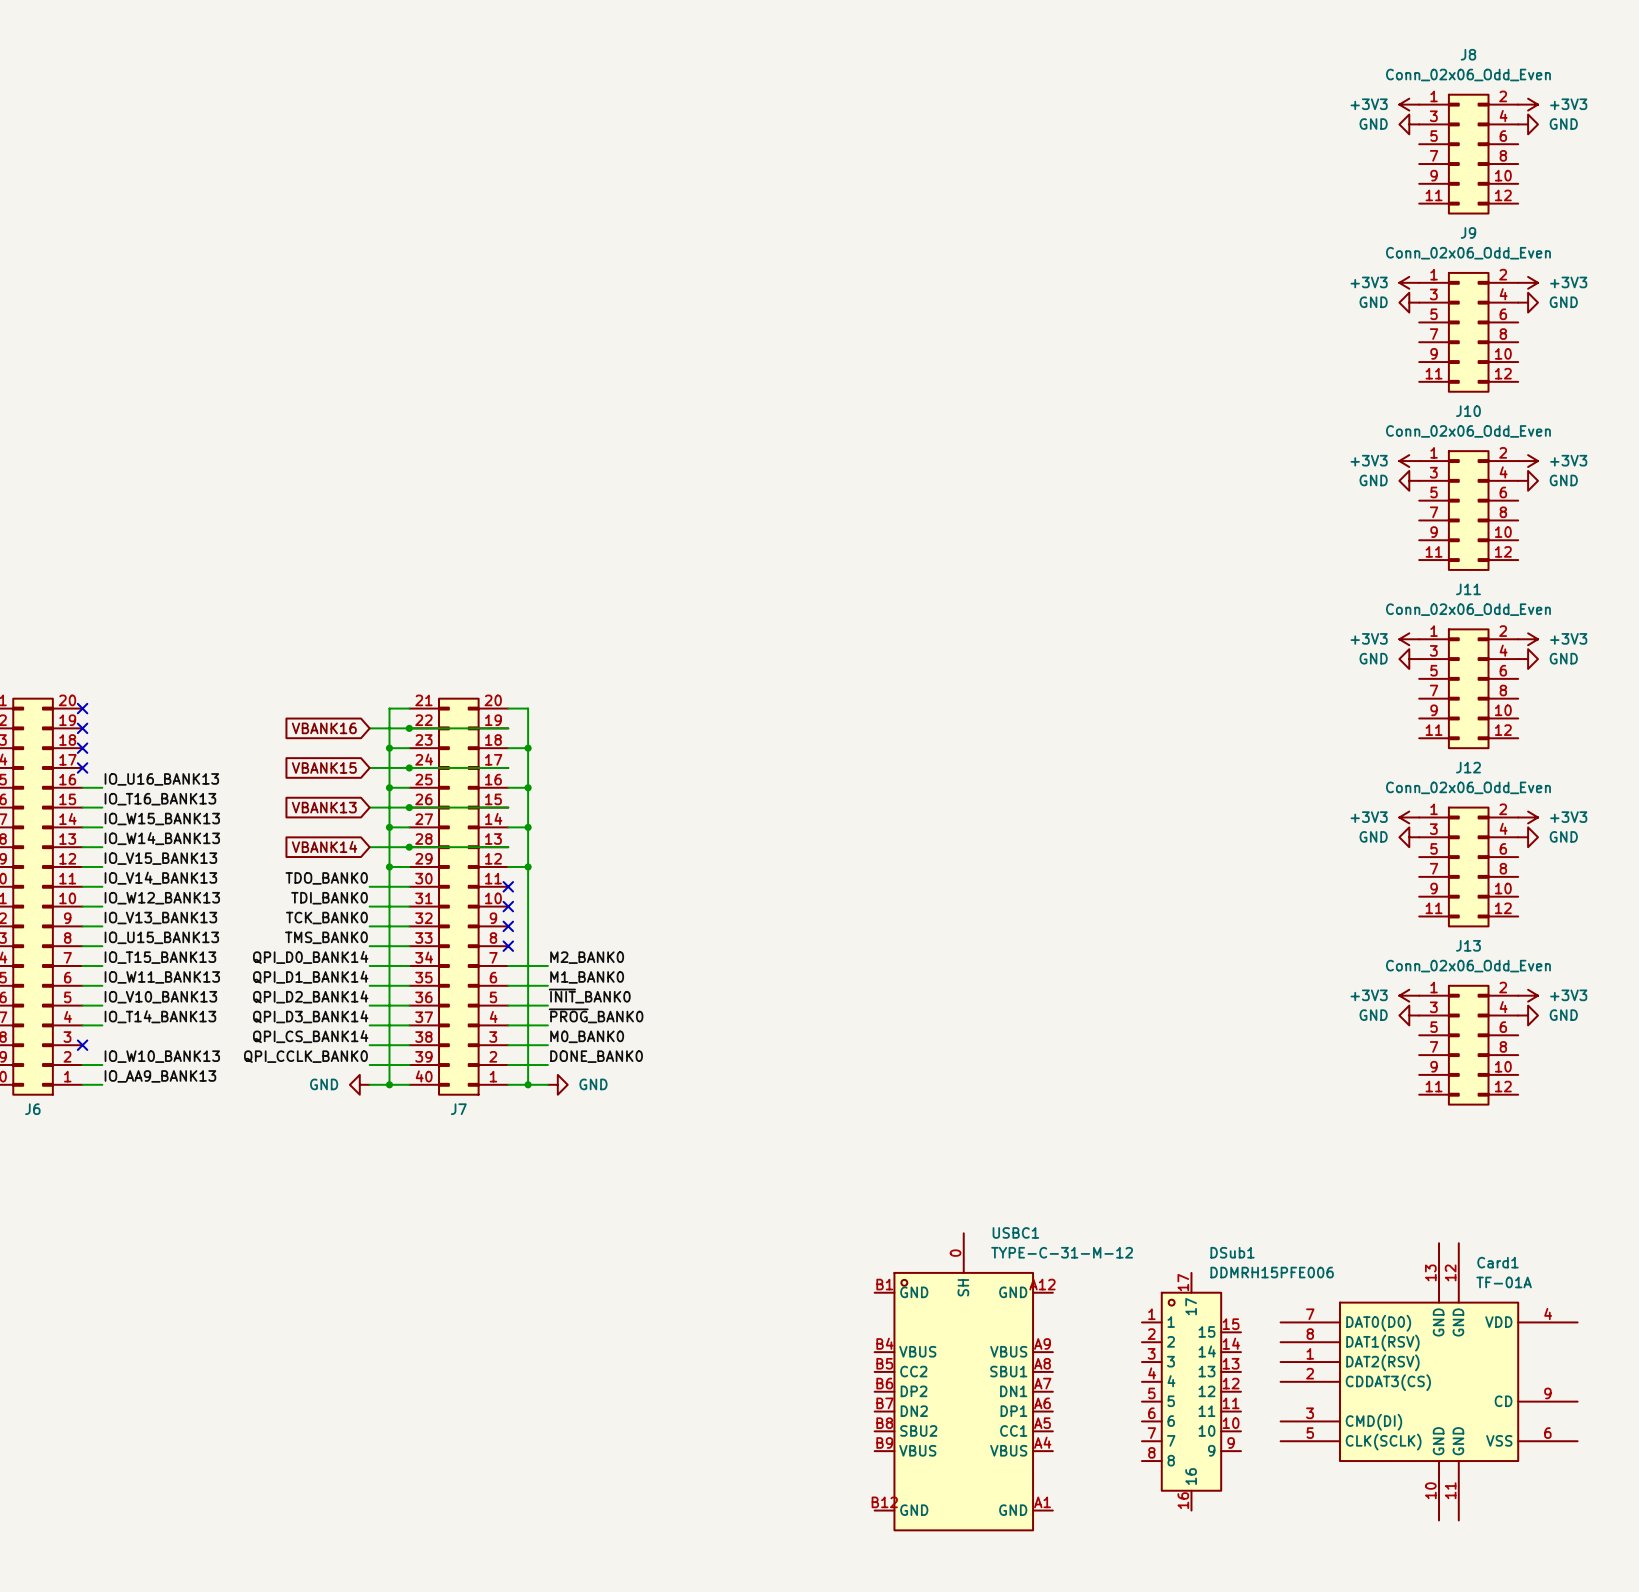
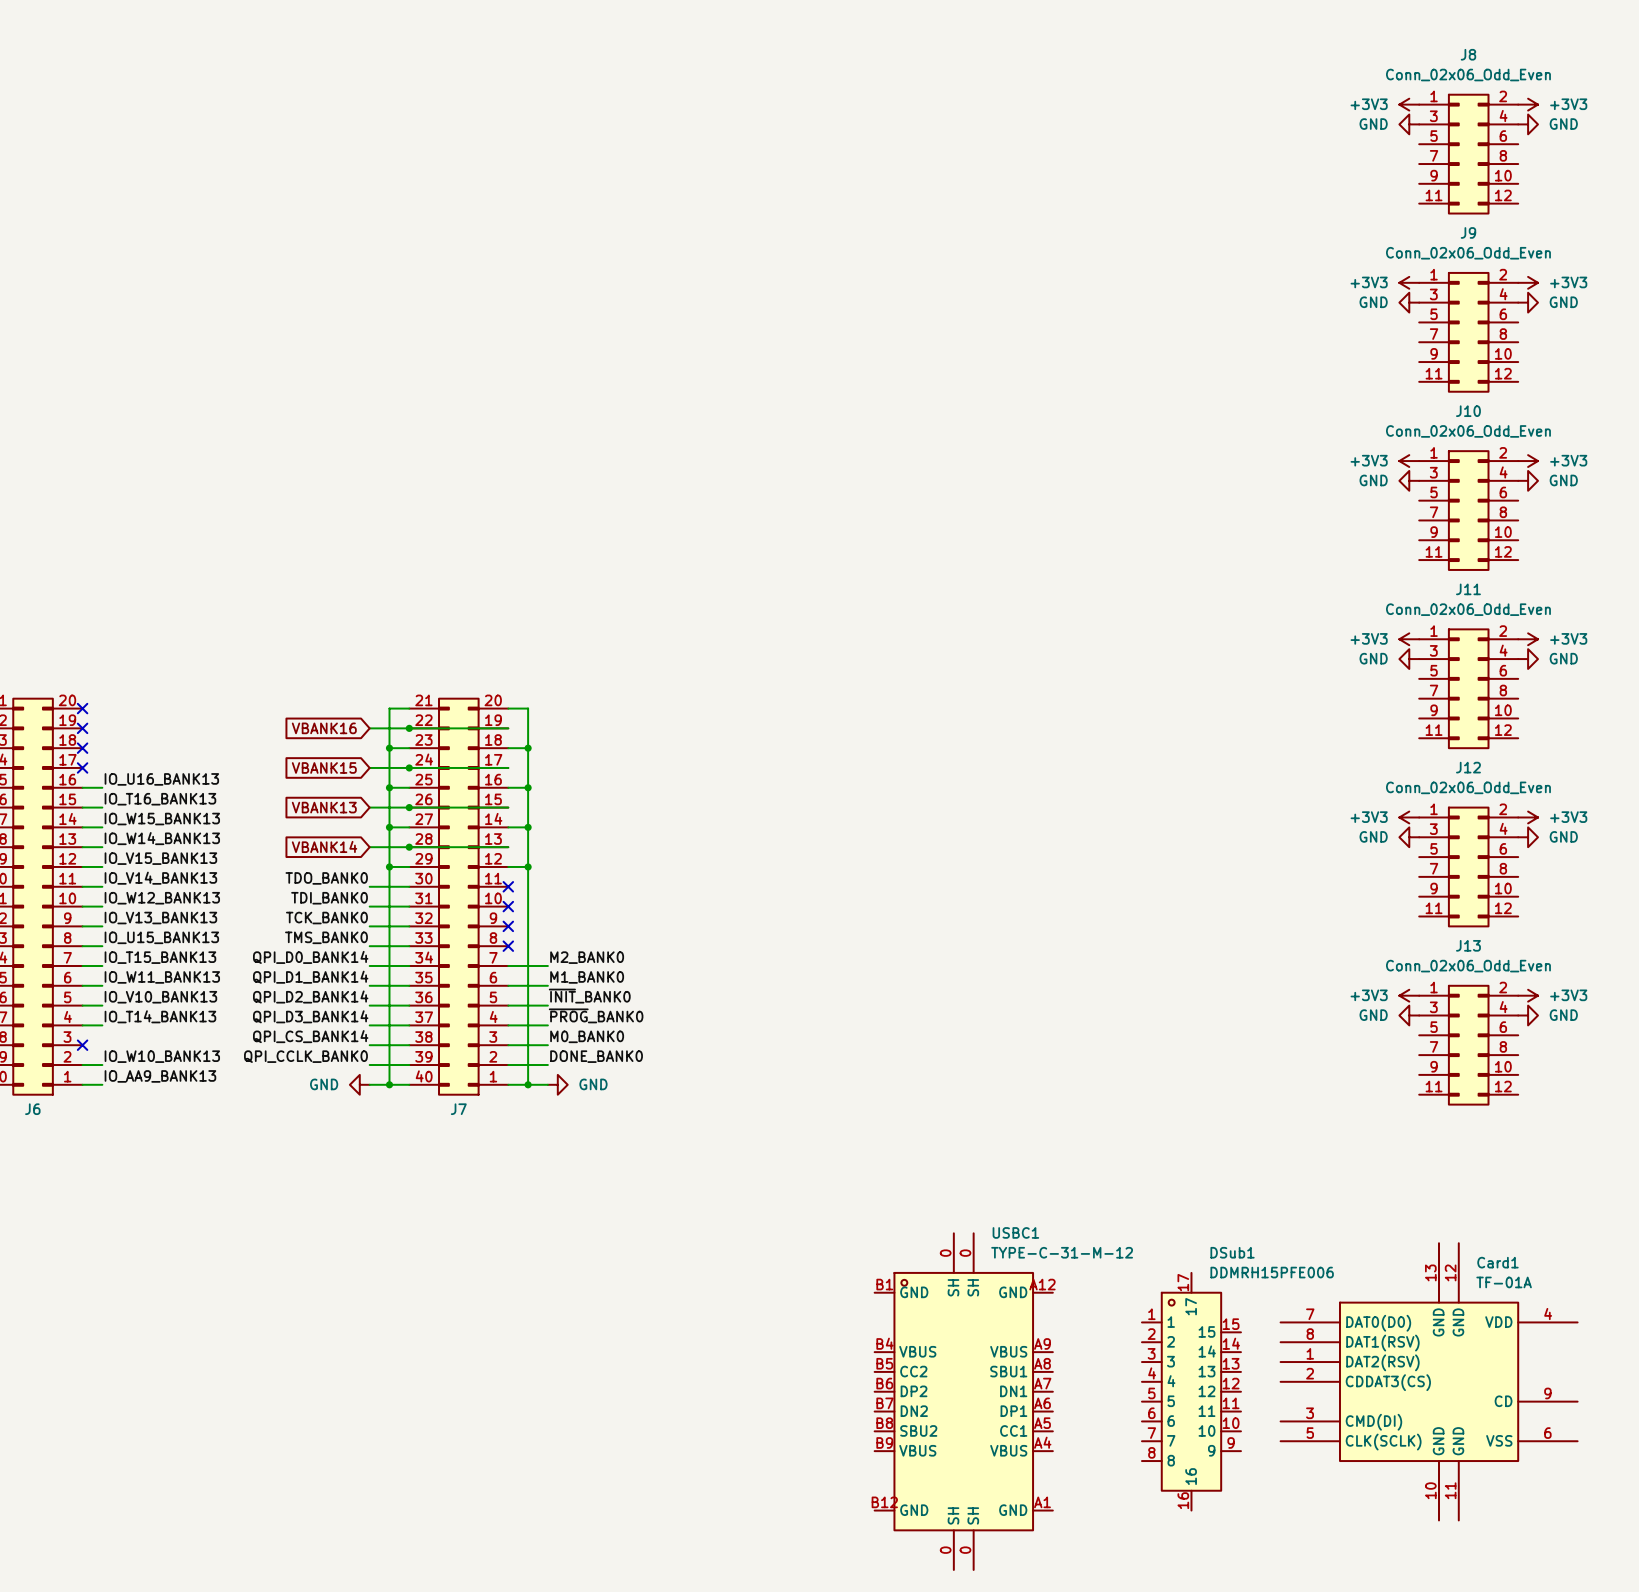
USBC1 symbol: [874, 1233, 1053, 1531] -> [874, 1233, 1053, 1570]

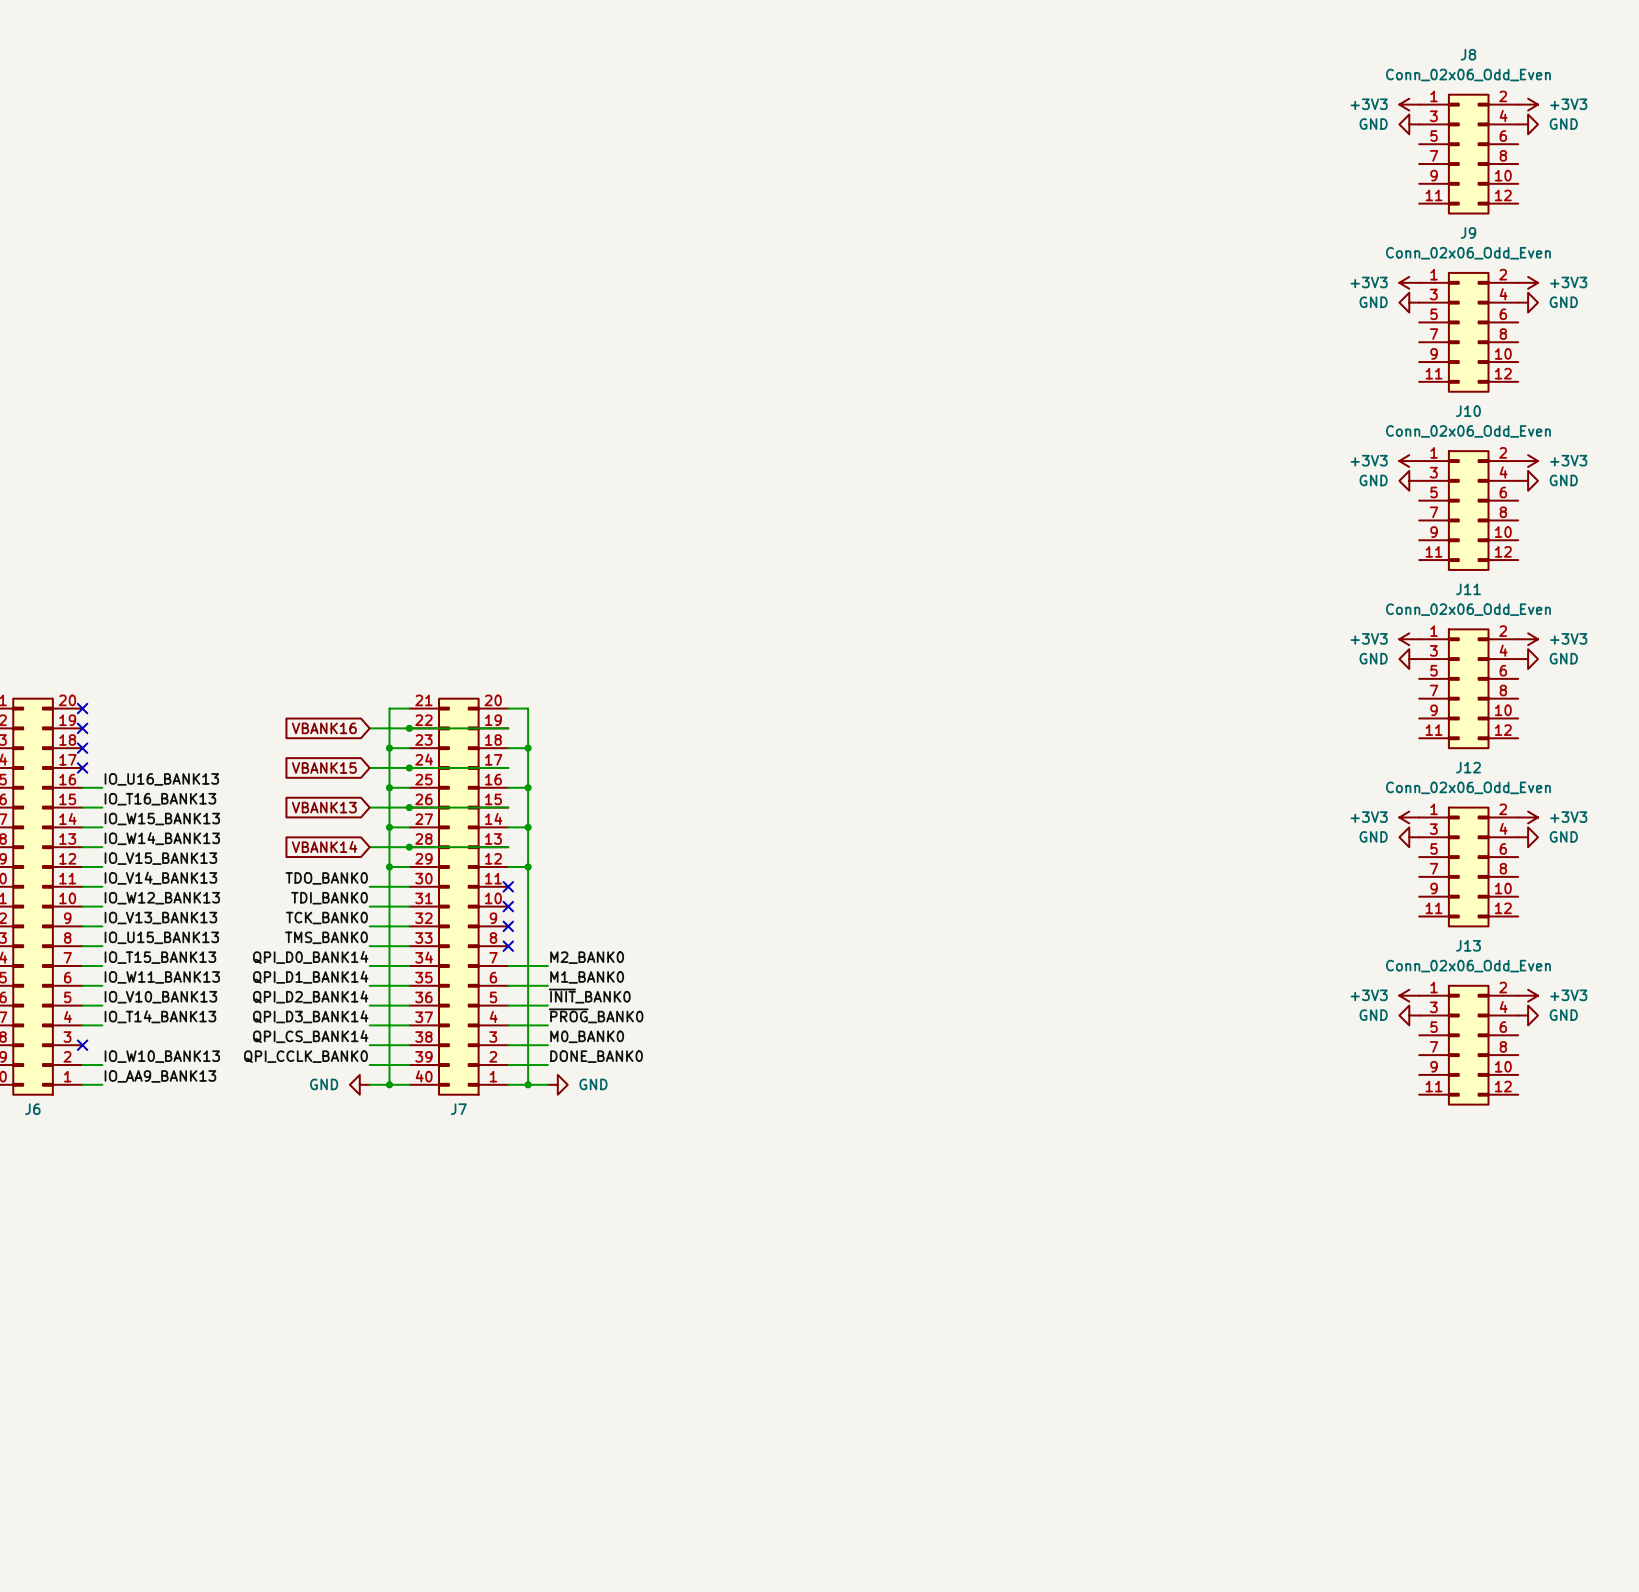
Card1: TF-01A (1429, 1381) -> none
DSub1: DDMRH15PFE006 (1191, 1391) -> none
USBC1: TYPE-C-31-M-12 (963, 1401) -> none

